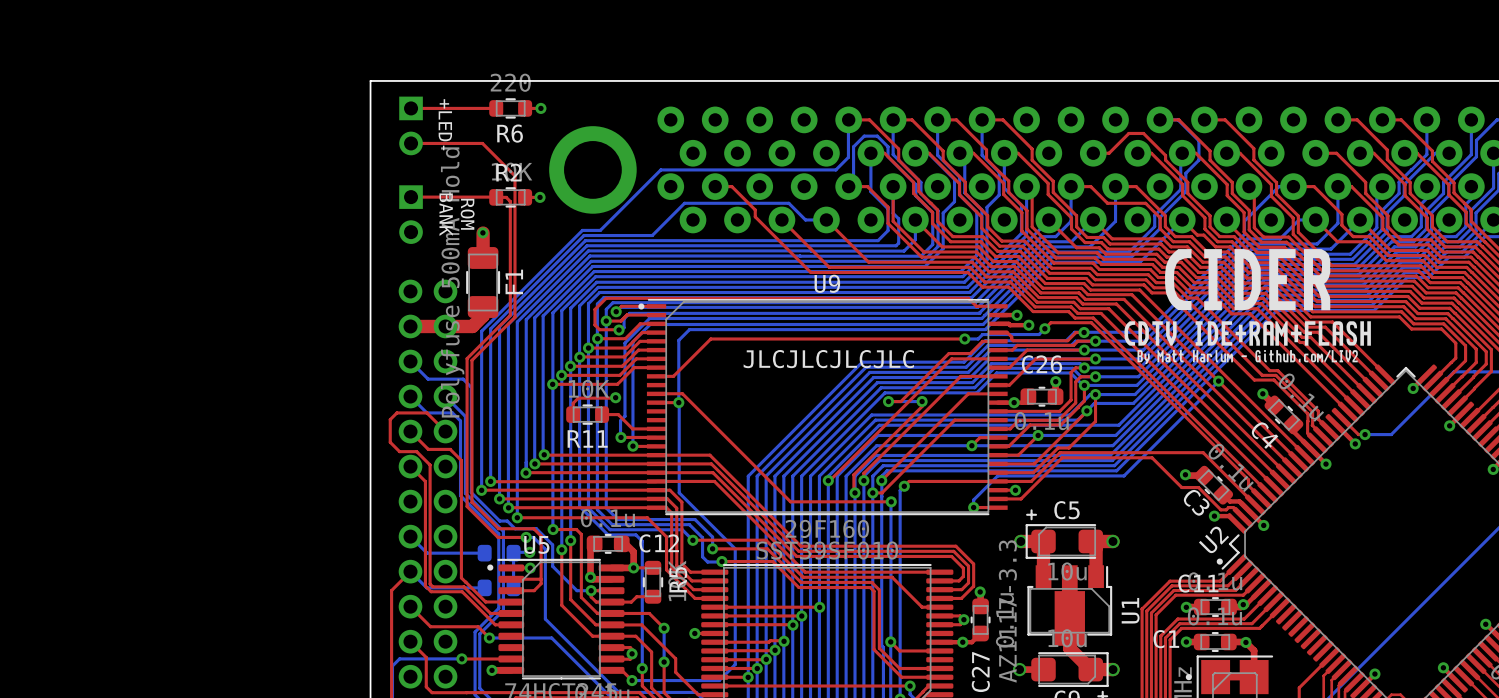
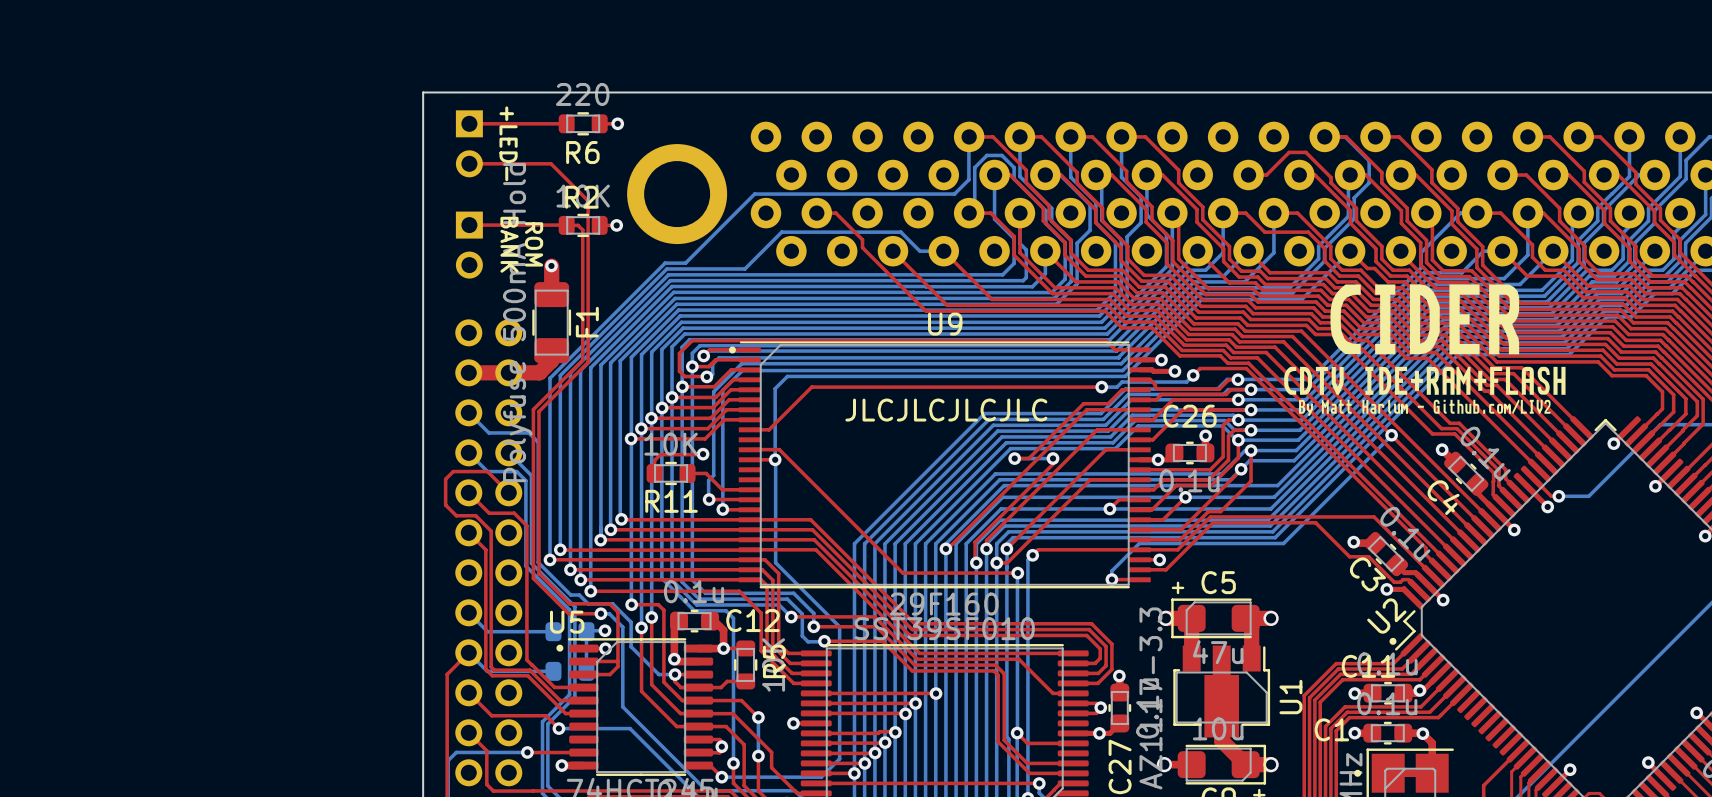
U5 name position: U5 (536, 544) -> U5 (567, 622)
C5 value: 10u (1067, 571) -> 47u (1218, 652)

